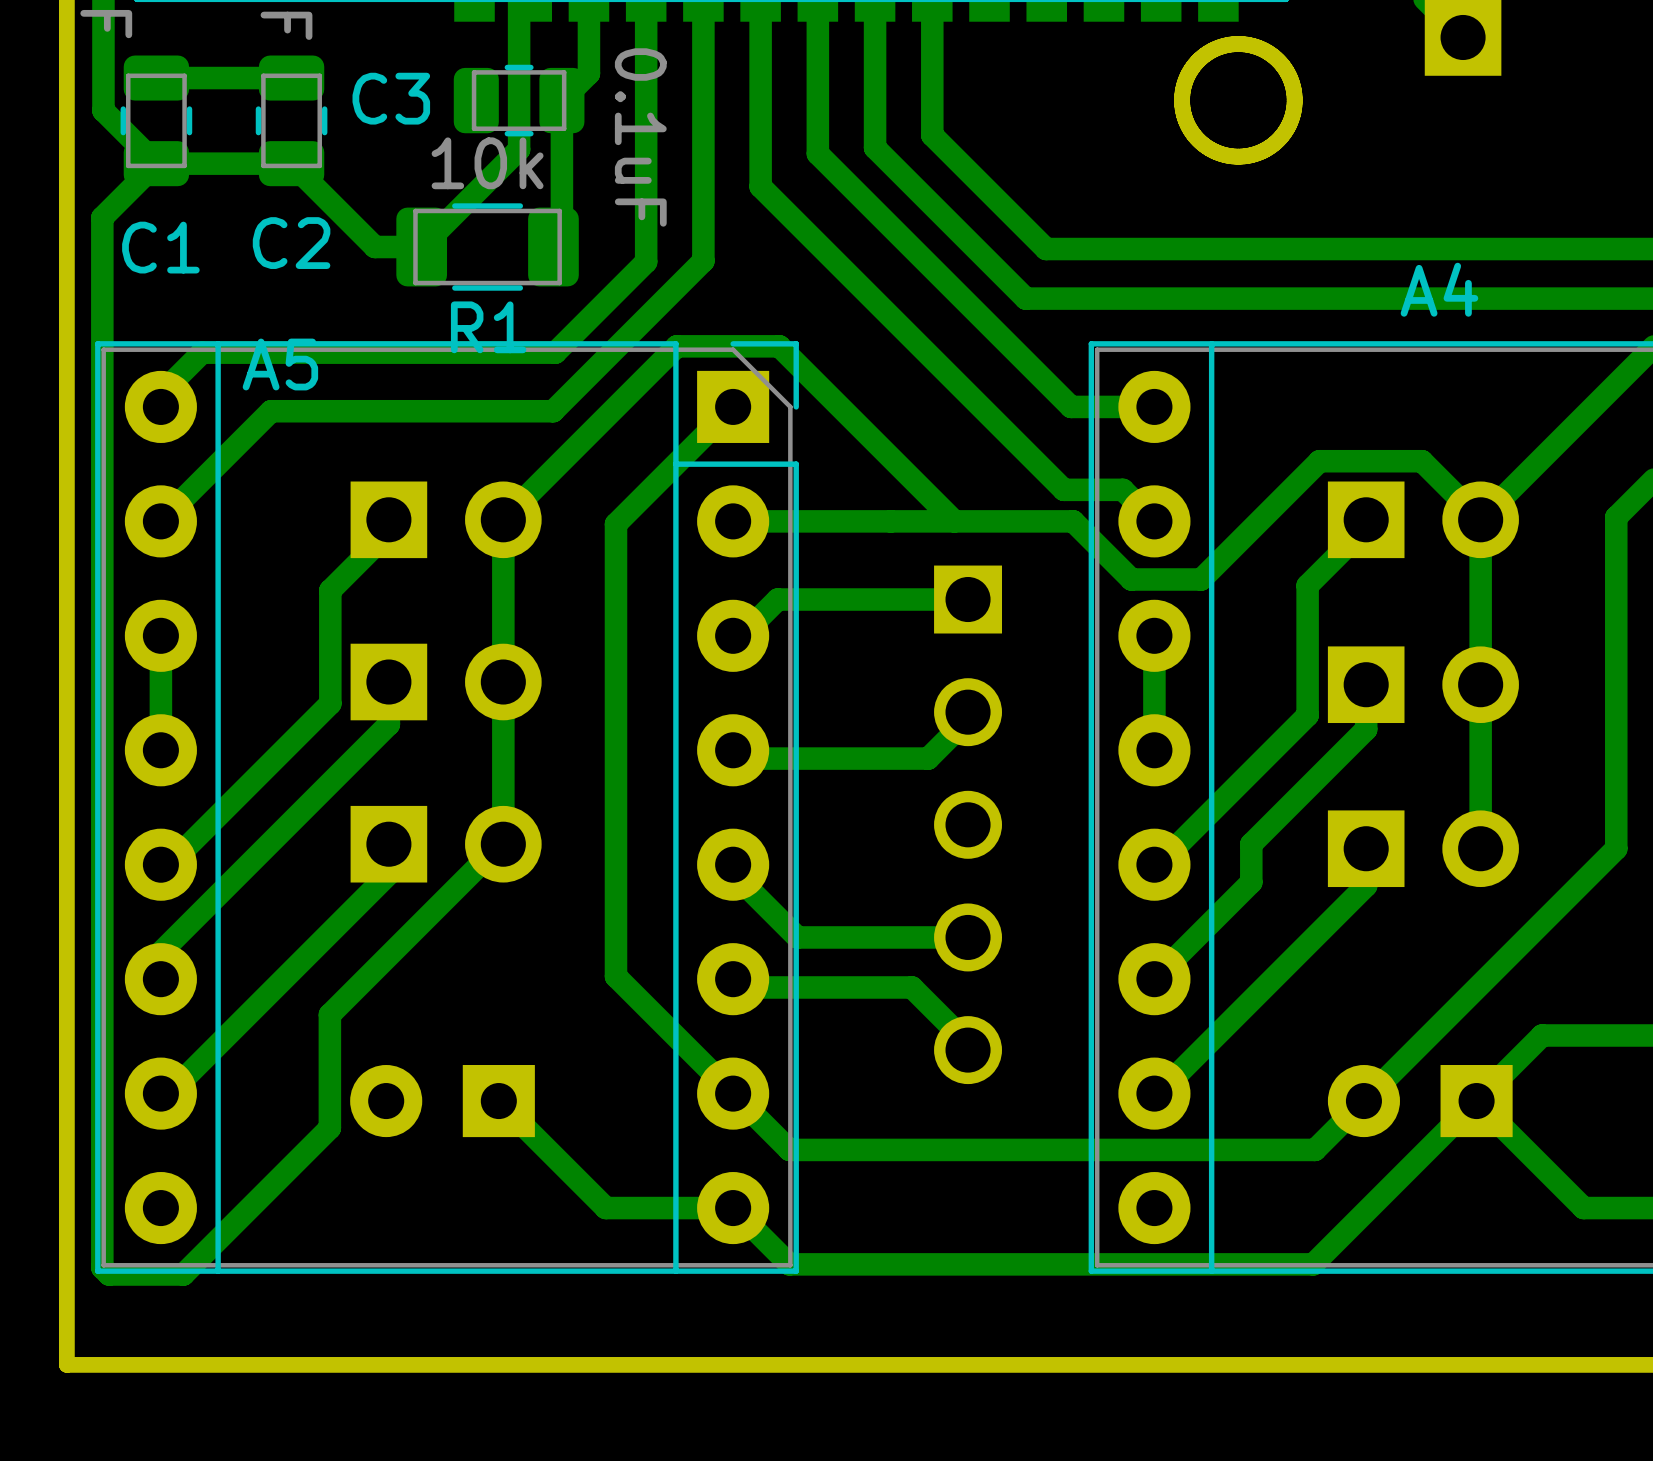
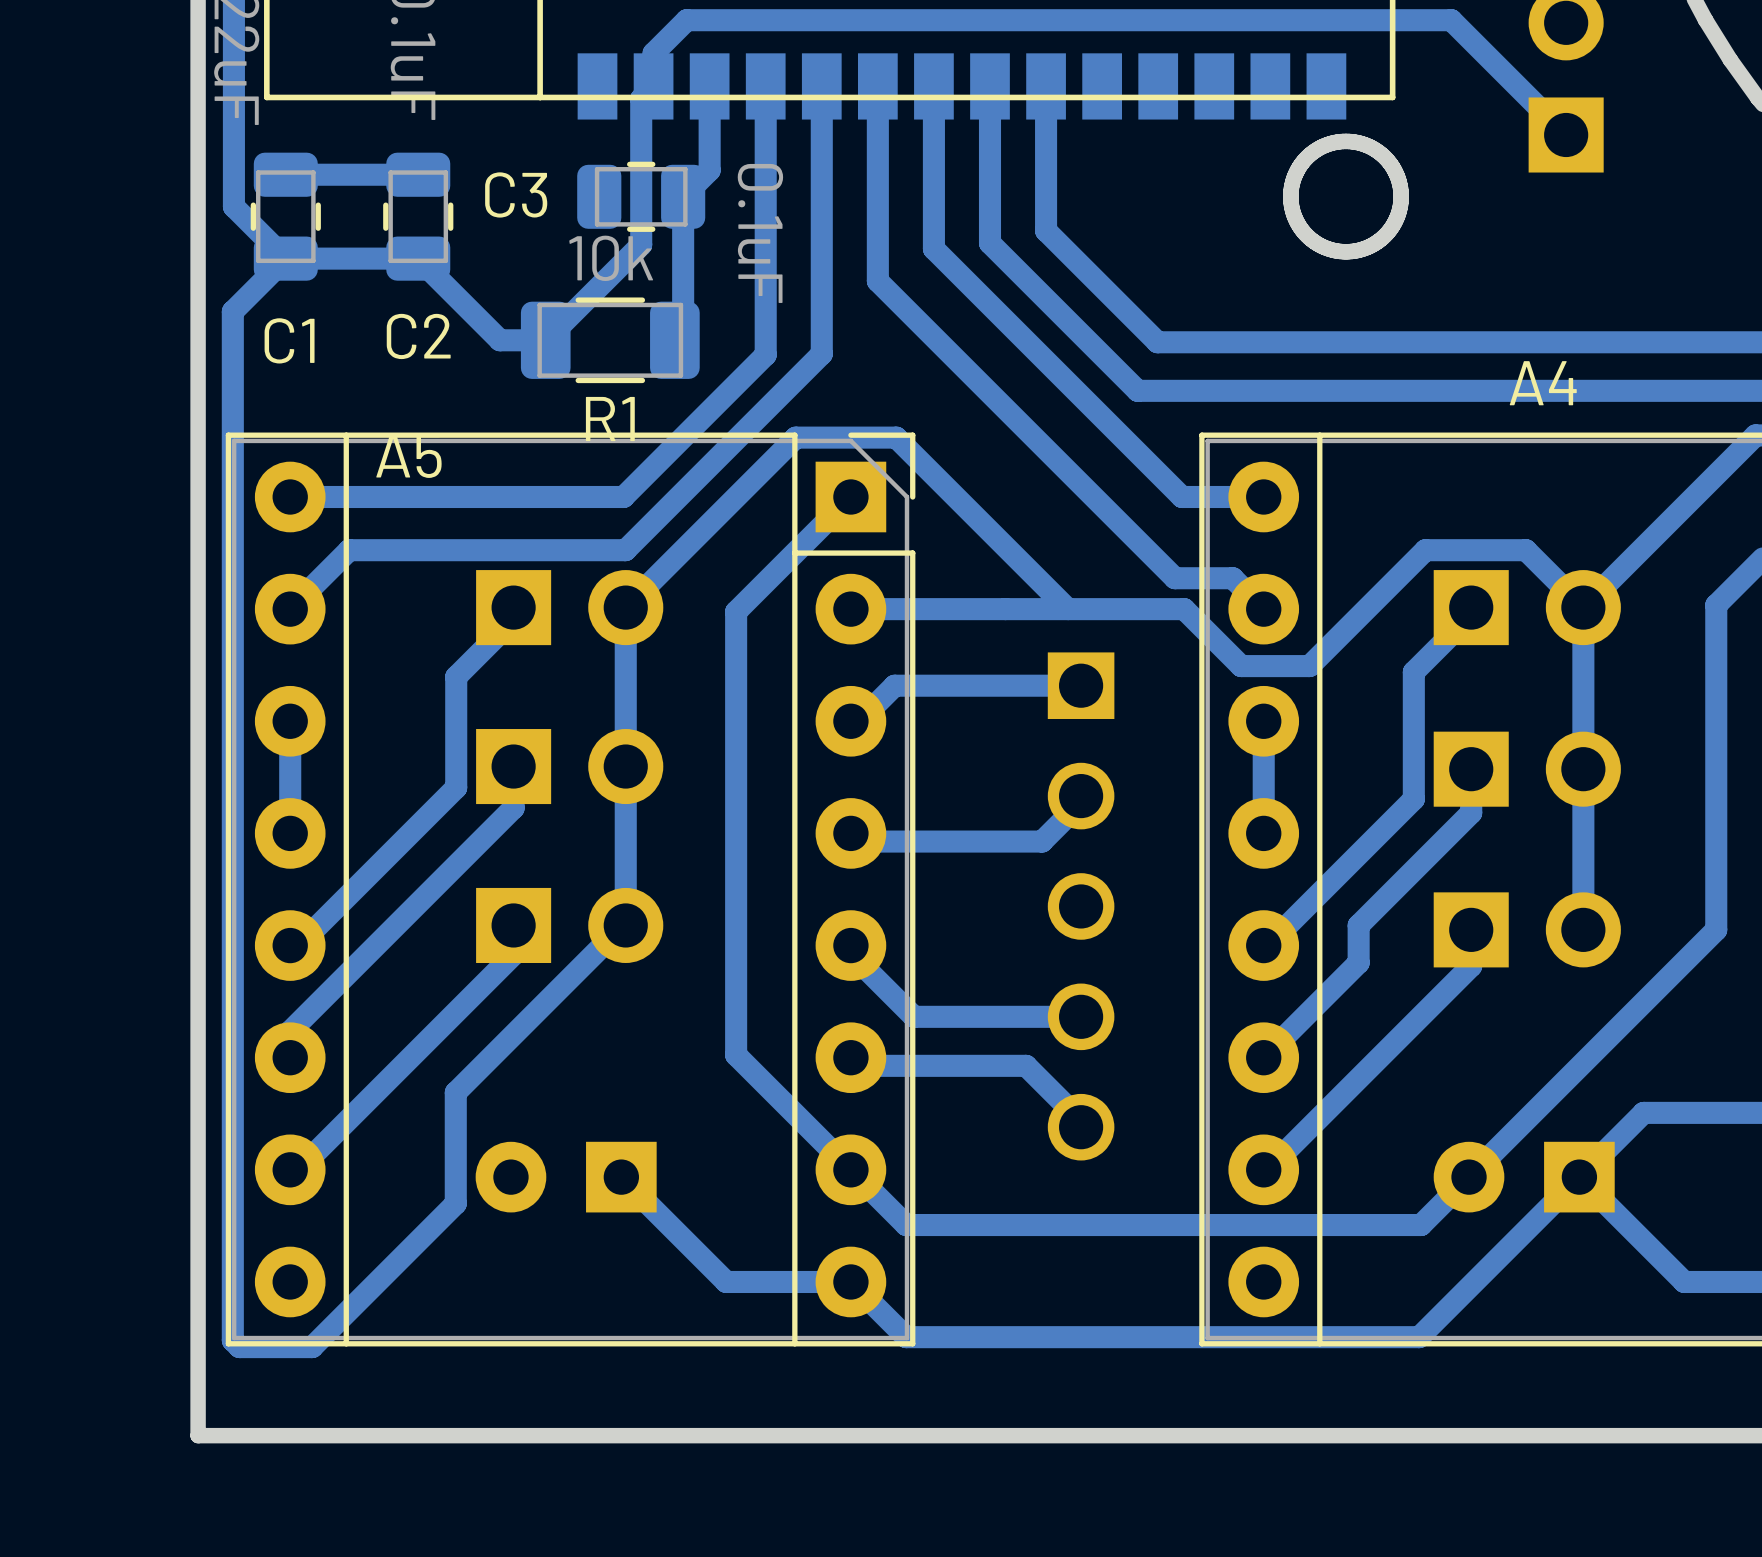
bottom track: (555, 352) (202, 352) (160, 393) (160, 406) -> (676, 443) (623, 496) (290, 496)
bottom track: (553, 411) (271, 411) (221, 461) -> (674, 501) (625, 550) (349, 550)

